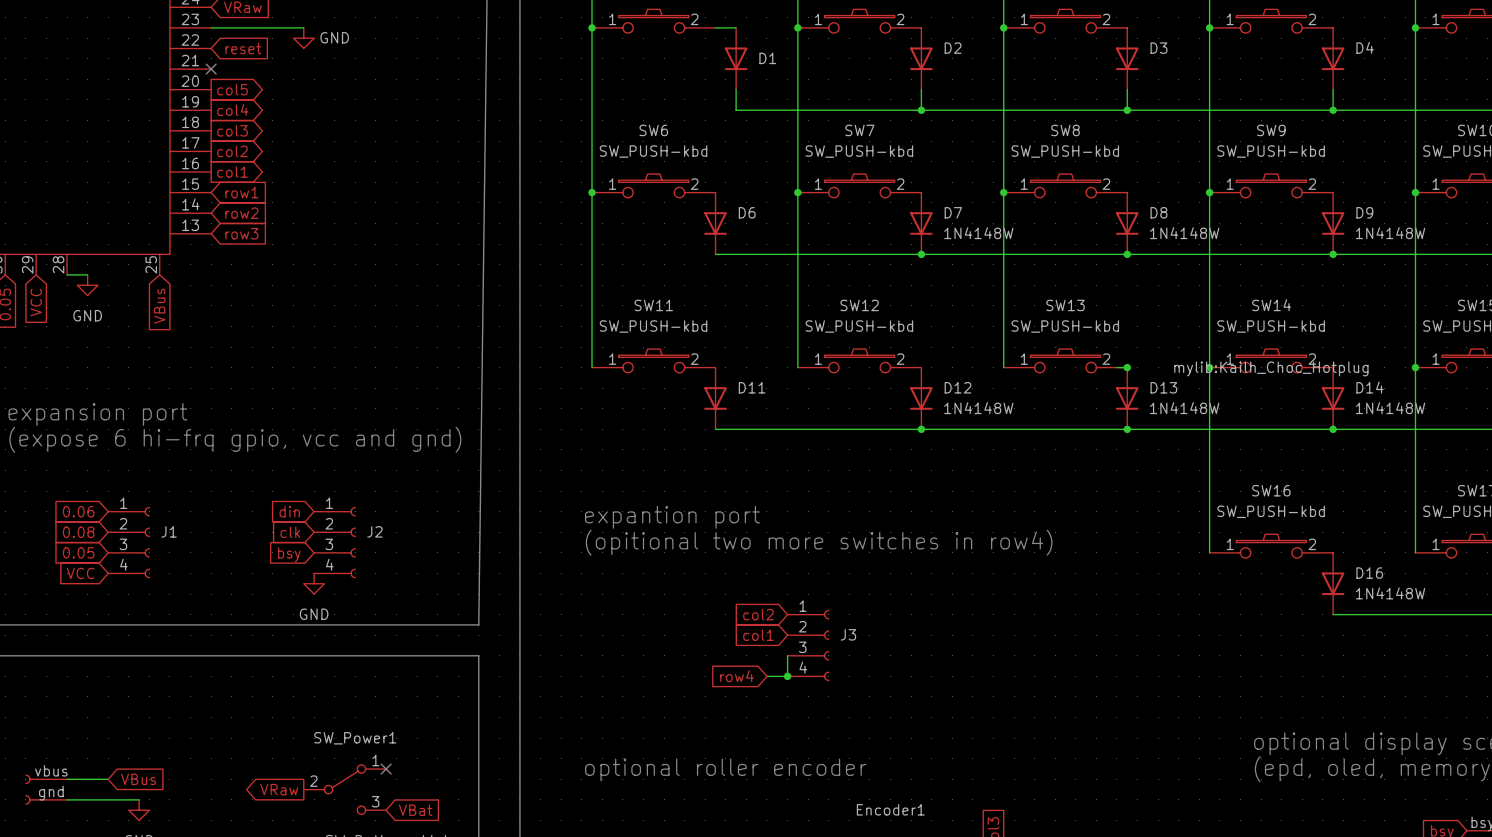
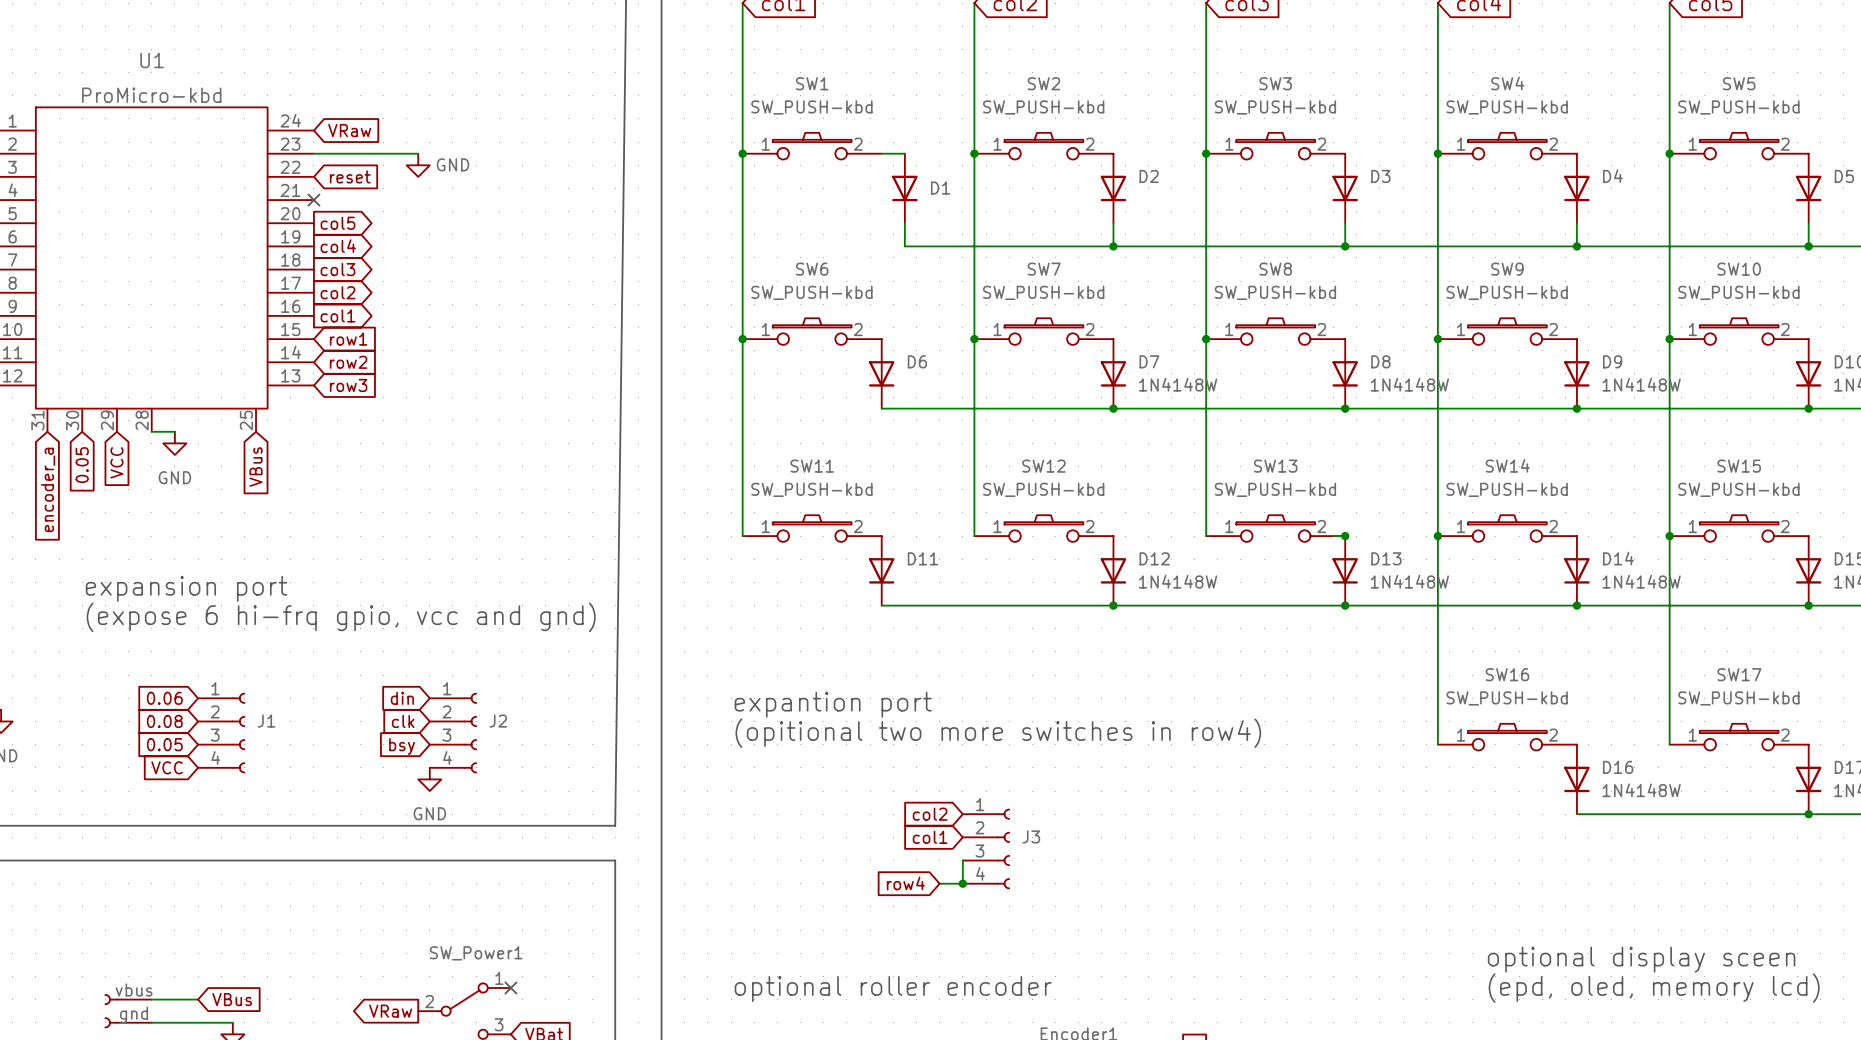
SW14 text: mylib:Kailh_Choc_Hotplug (1271, 368) -> none

